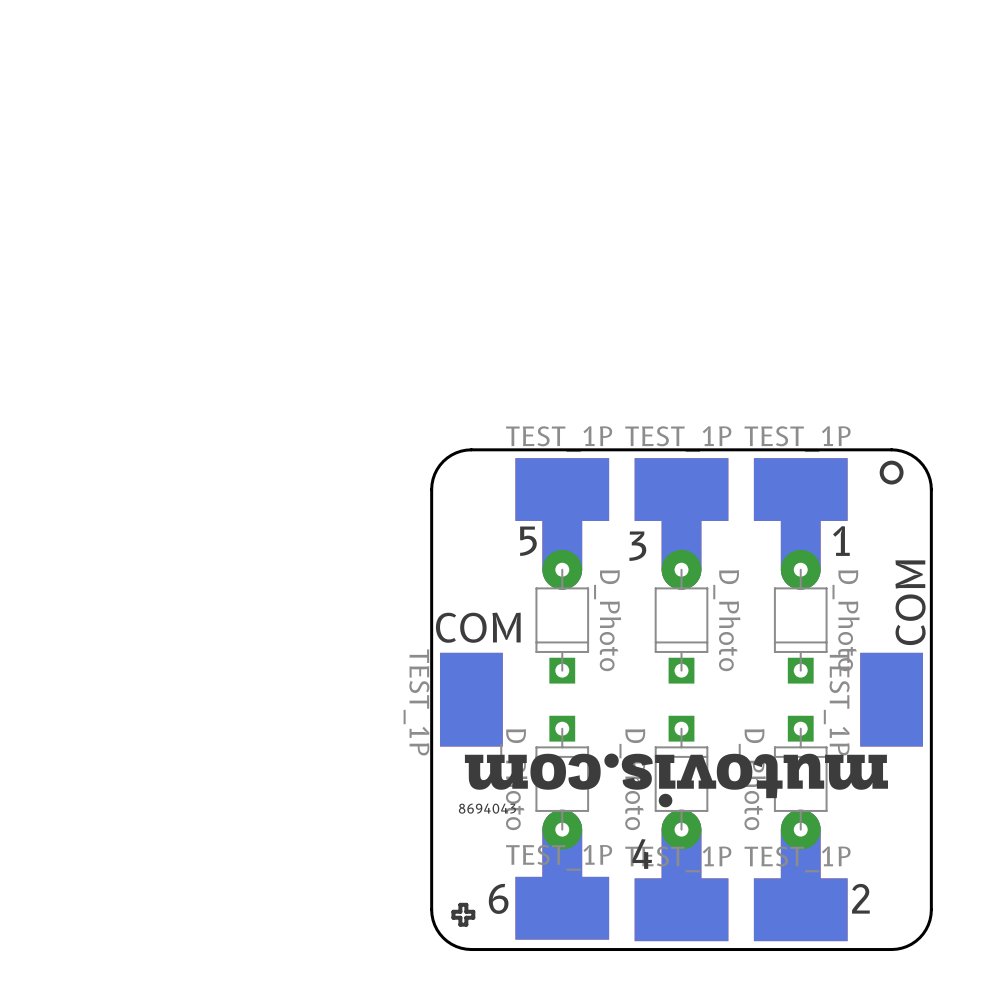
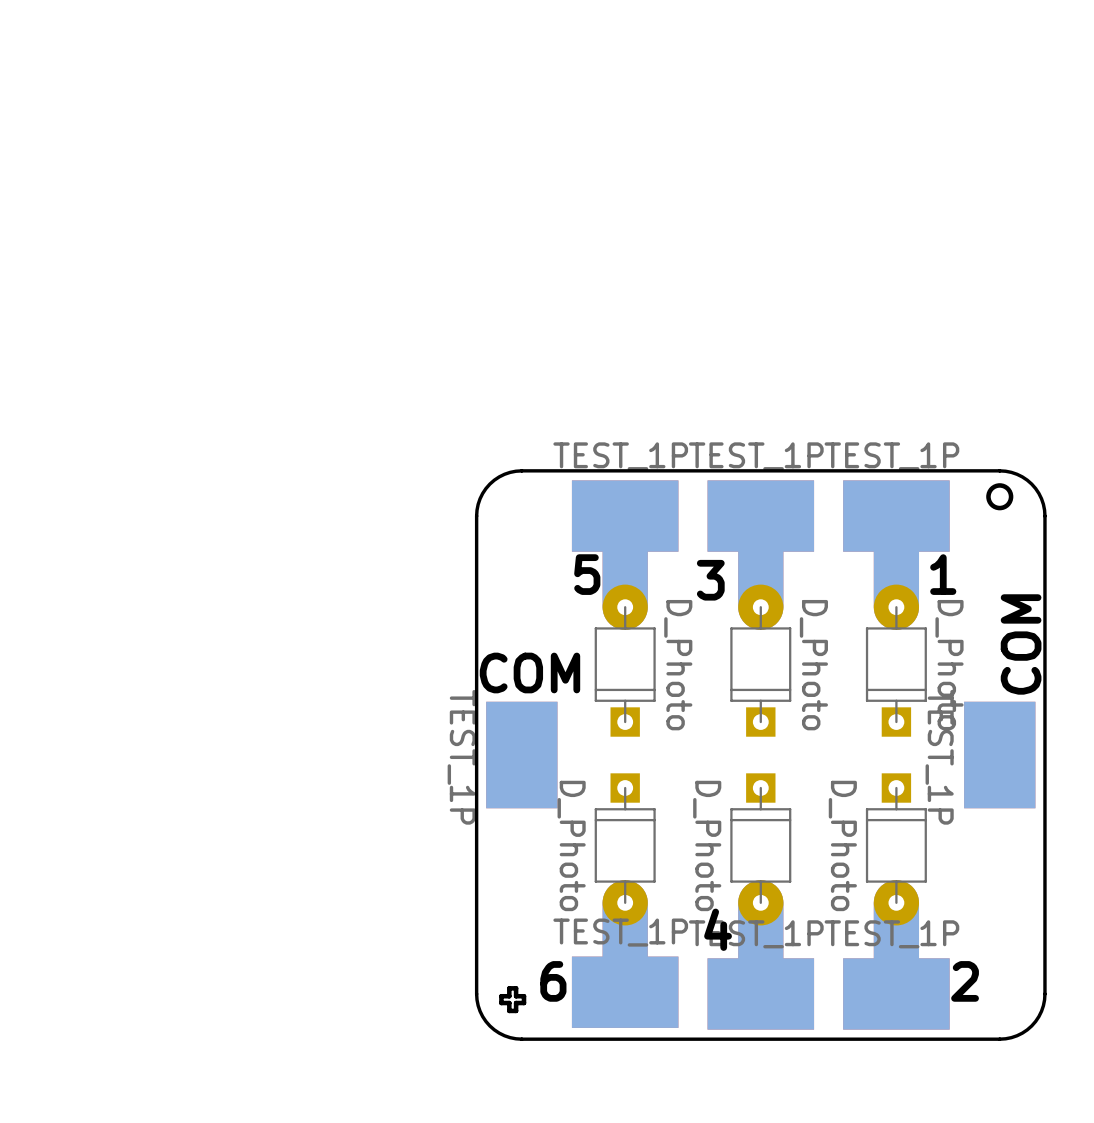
drawing: [464, 753, 889, 808] -> none
text: 8694043 (487, 808) -> none

